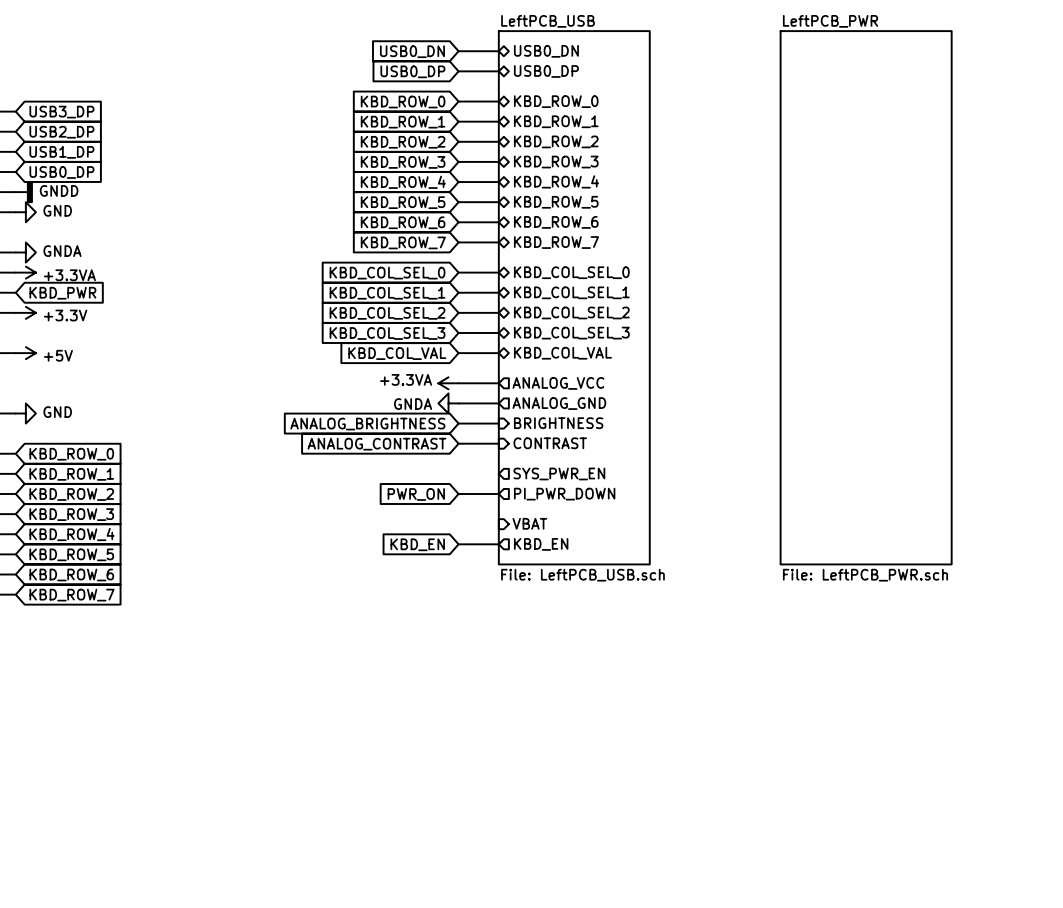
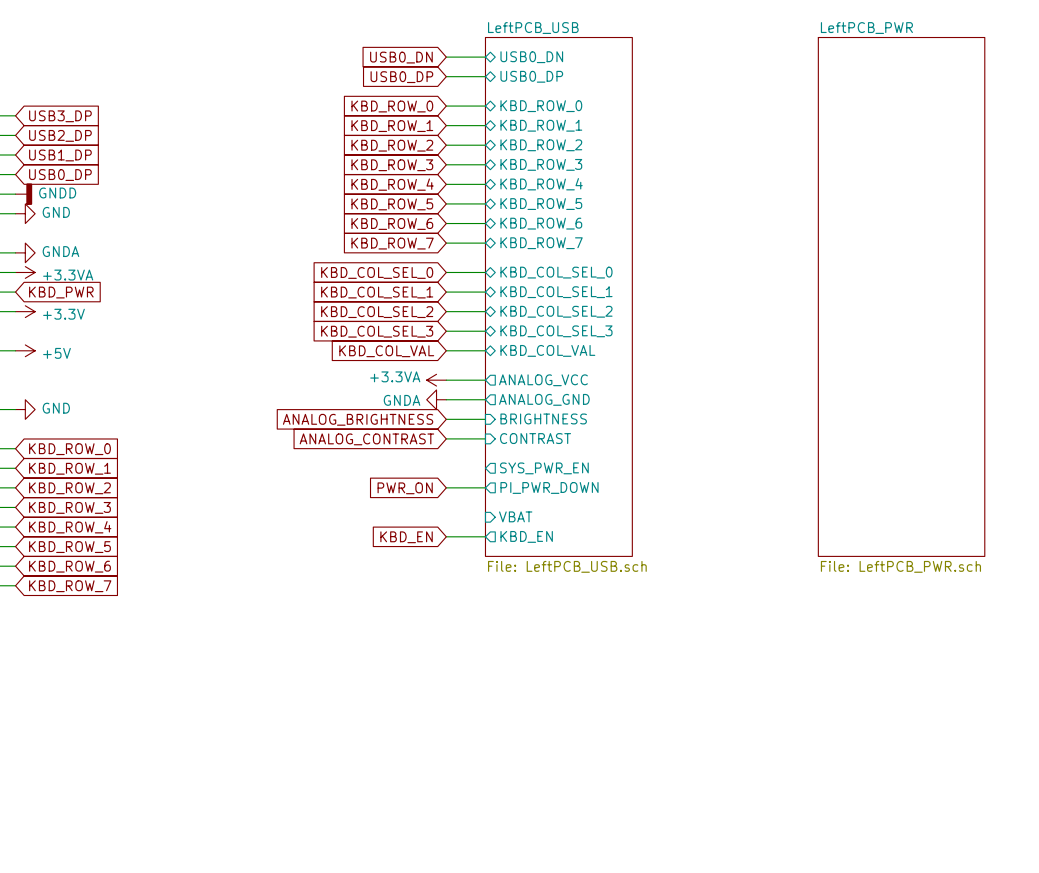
sheet LeftPCB_PWR position: (866, 297) -> (901, 296)

